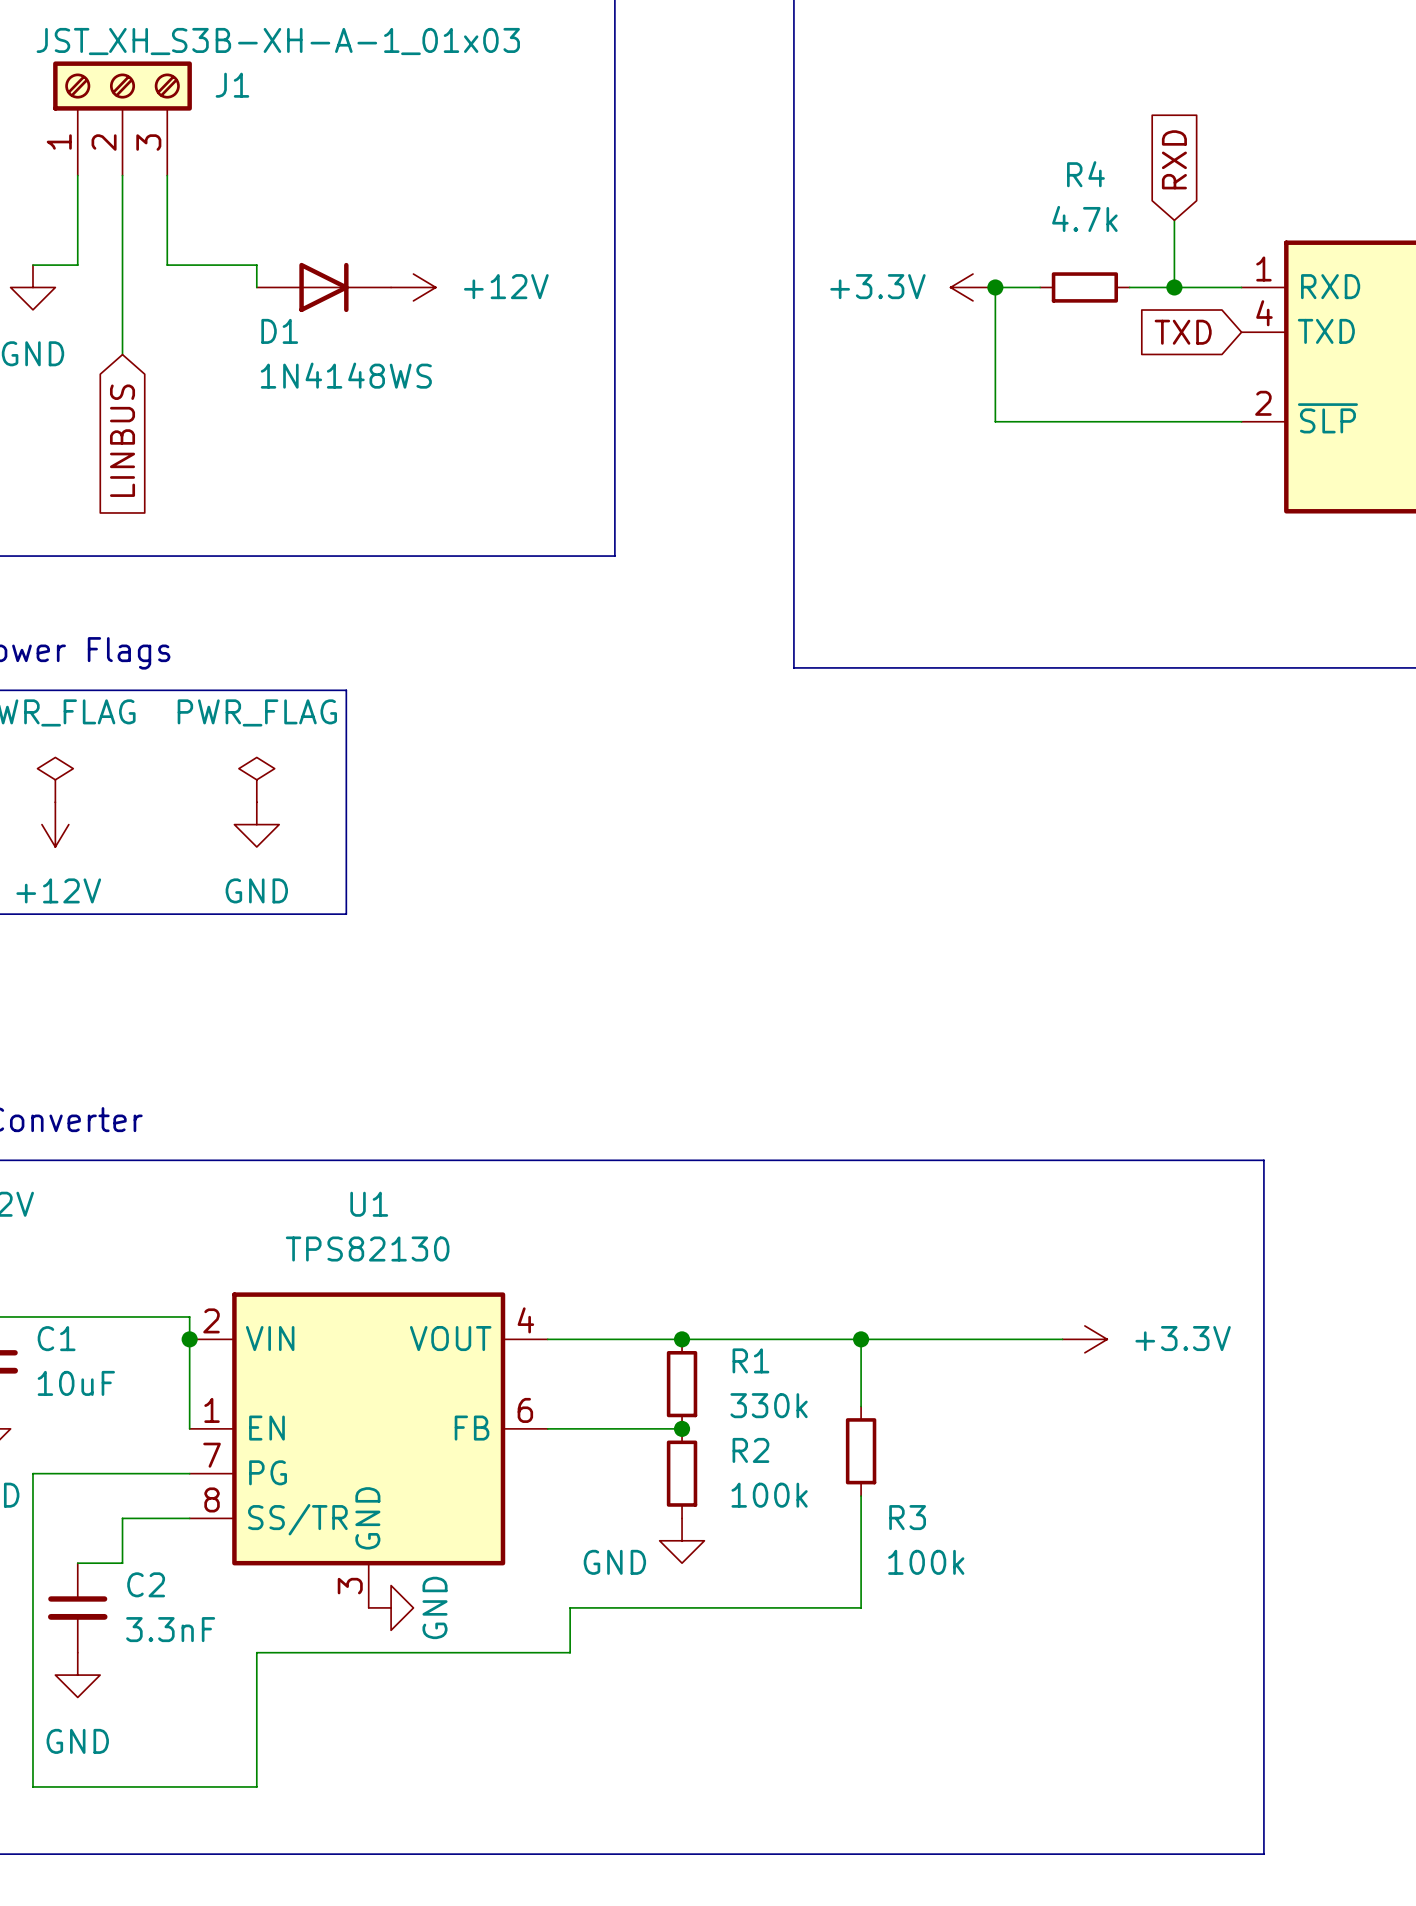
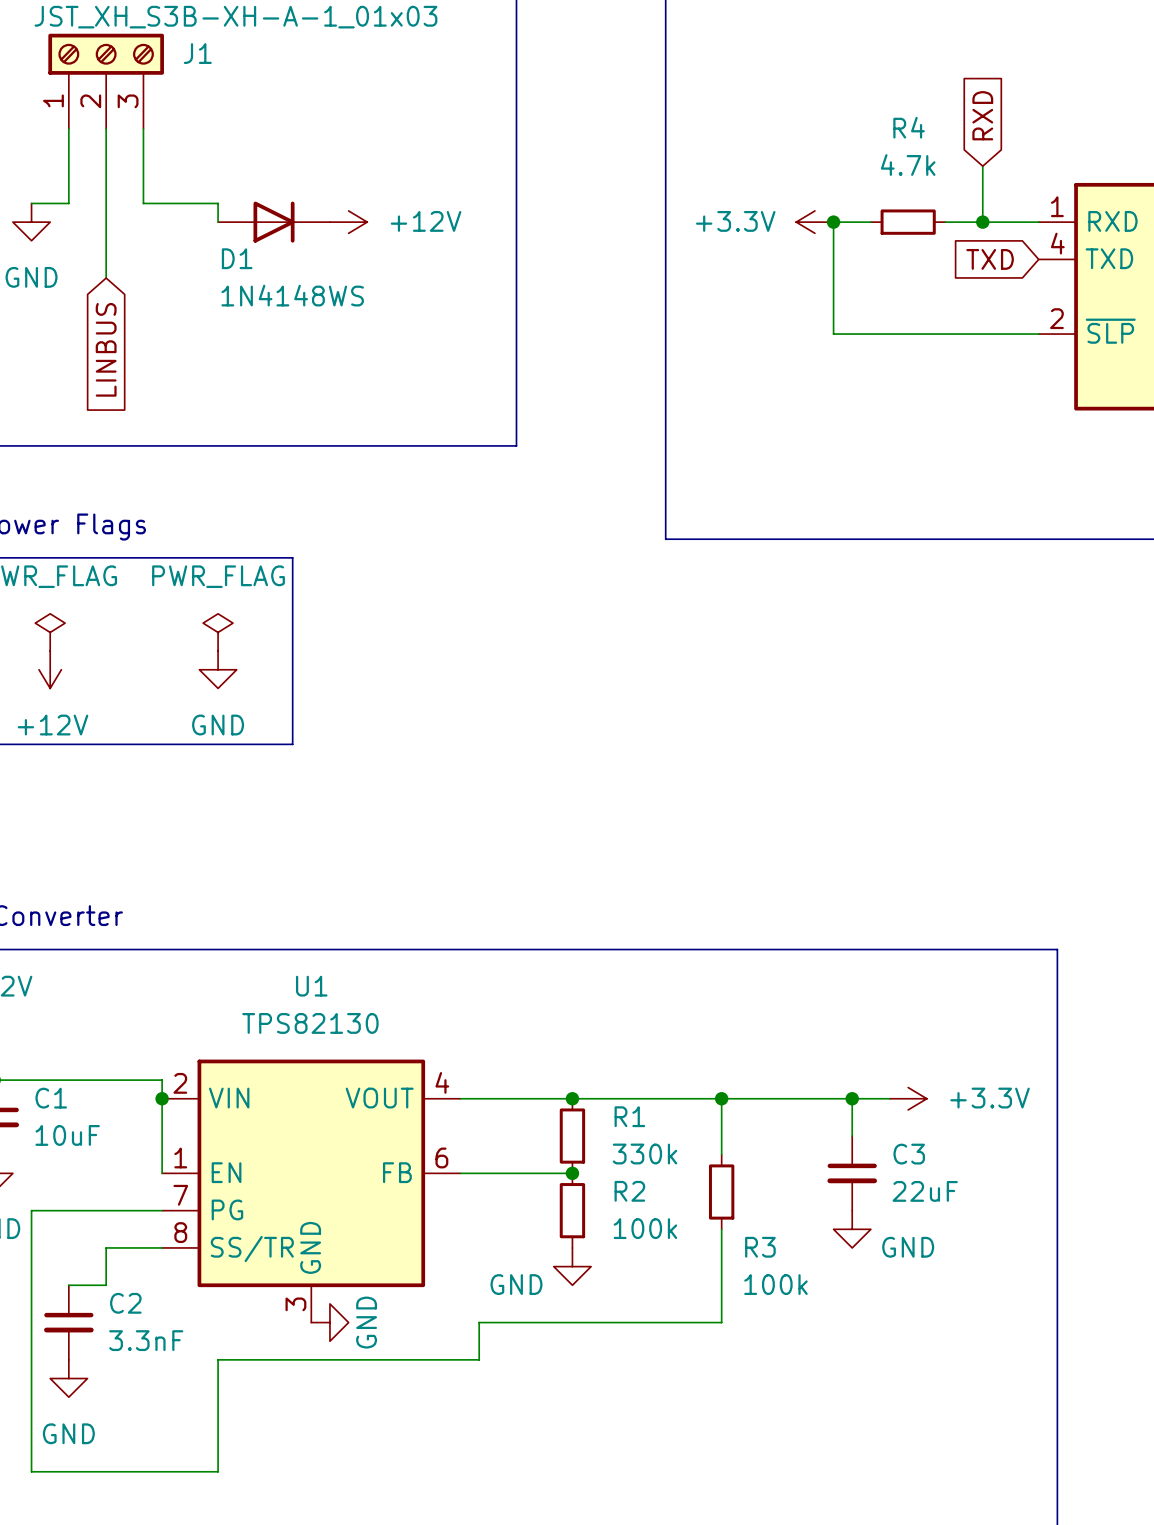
wire: none -> (852, 1098) (852, 1136)
junction: none -> (852, 1098)
C3: none -> 22uF (852, 1173)
power symbol: none -> GND (852, 1229)

